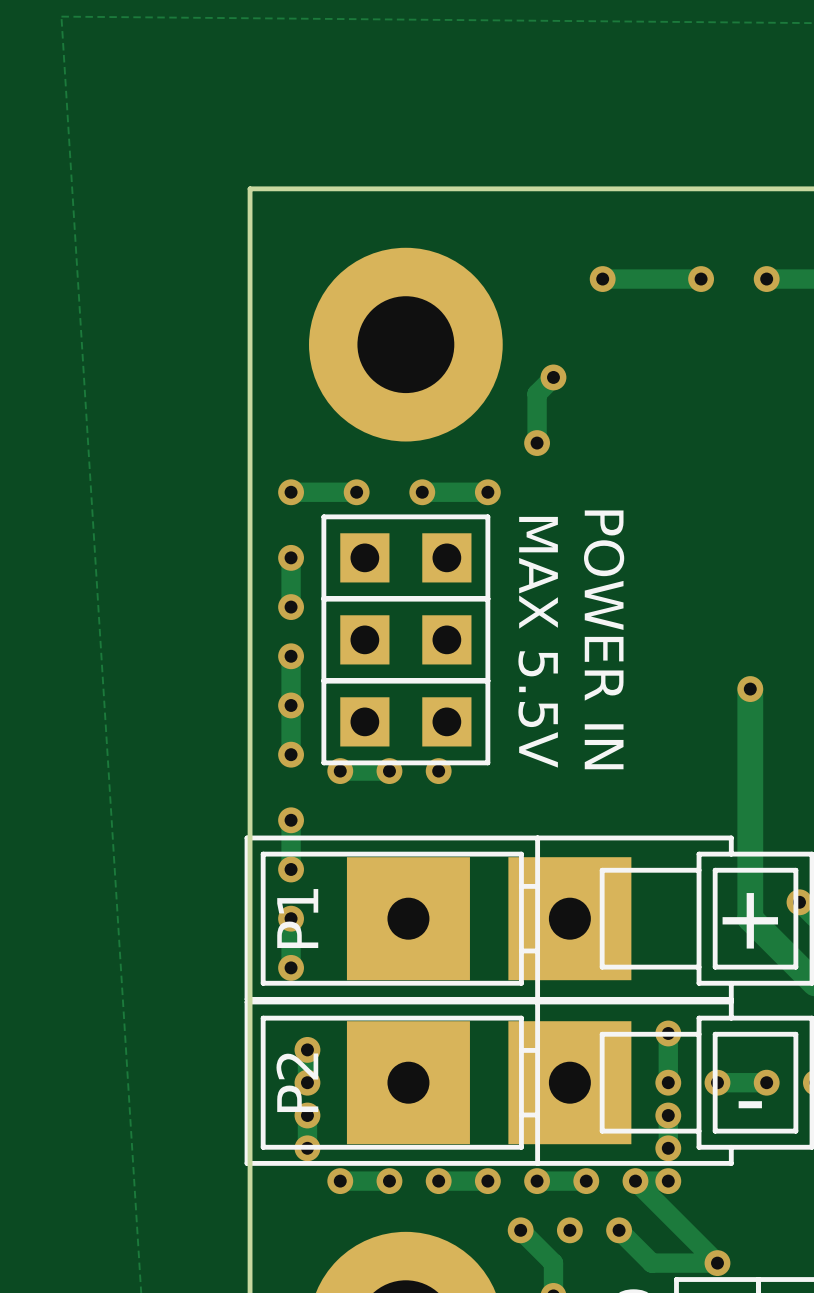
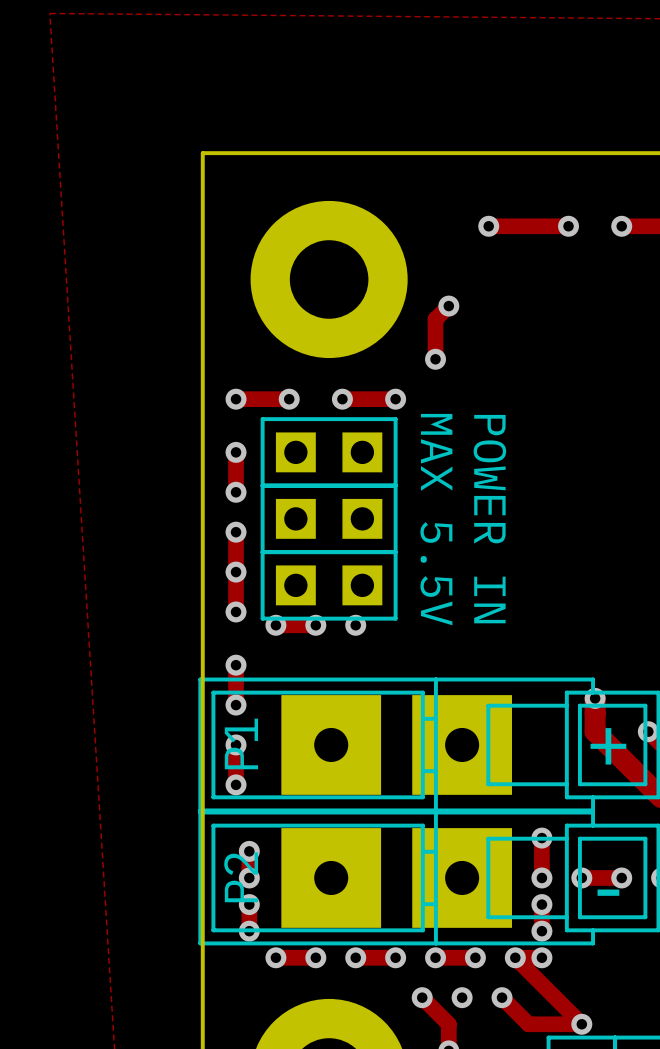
track: (750, 689) (750, 918) -> (595, 698) (595, 731) (608, 744)
via position: (750, 689) -> (595, 698)

